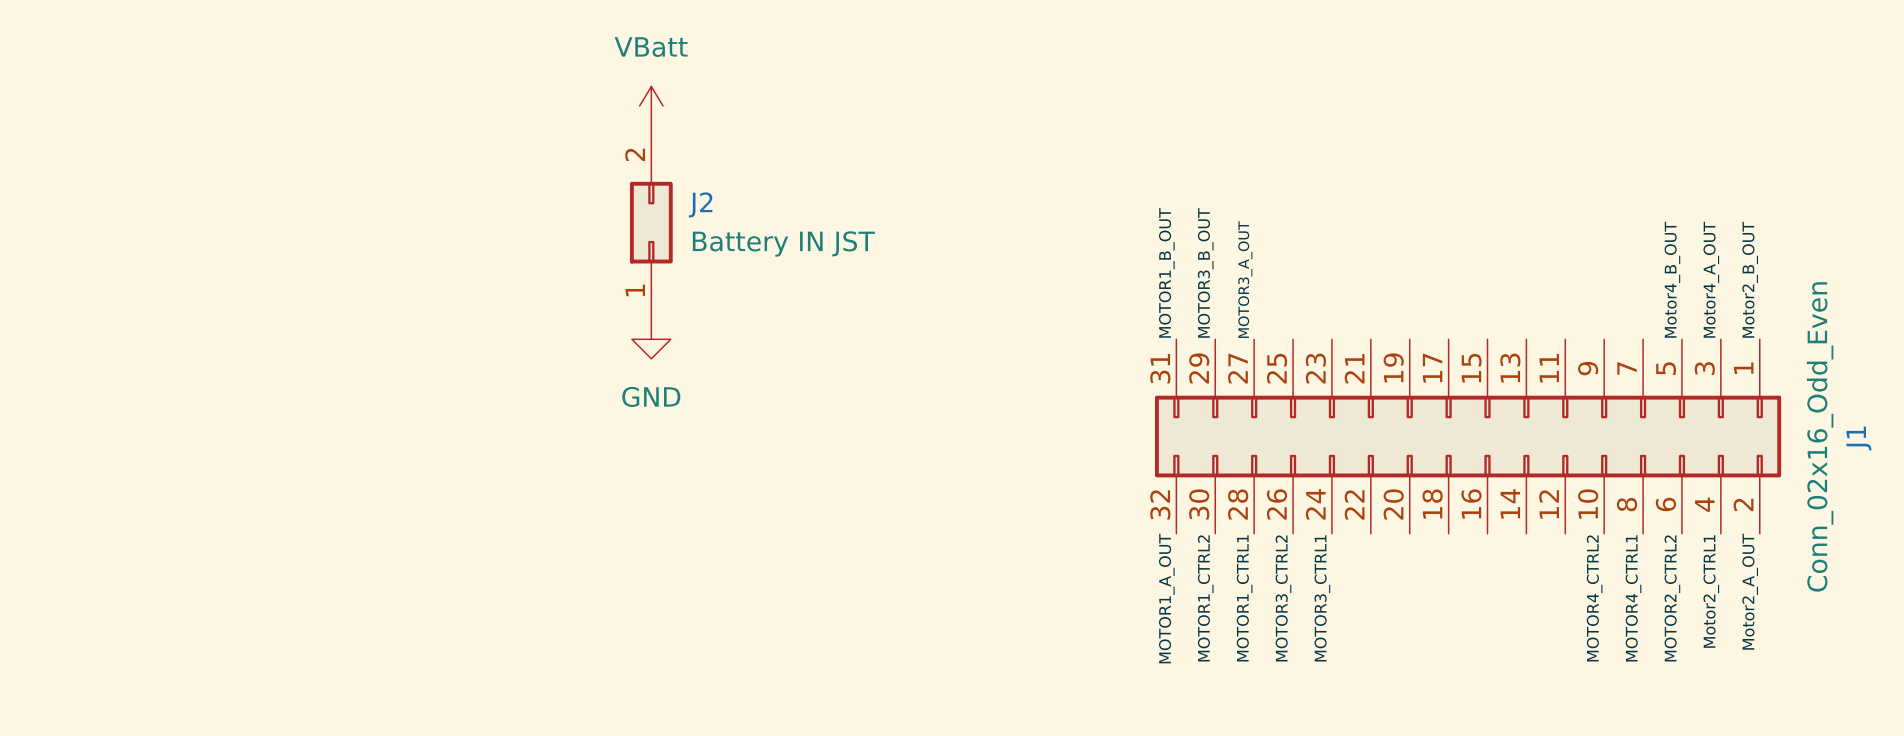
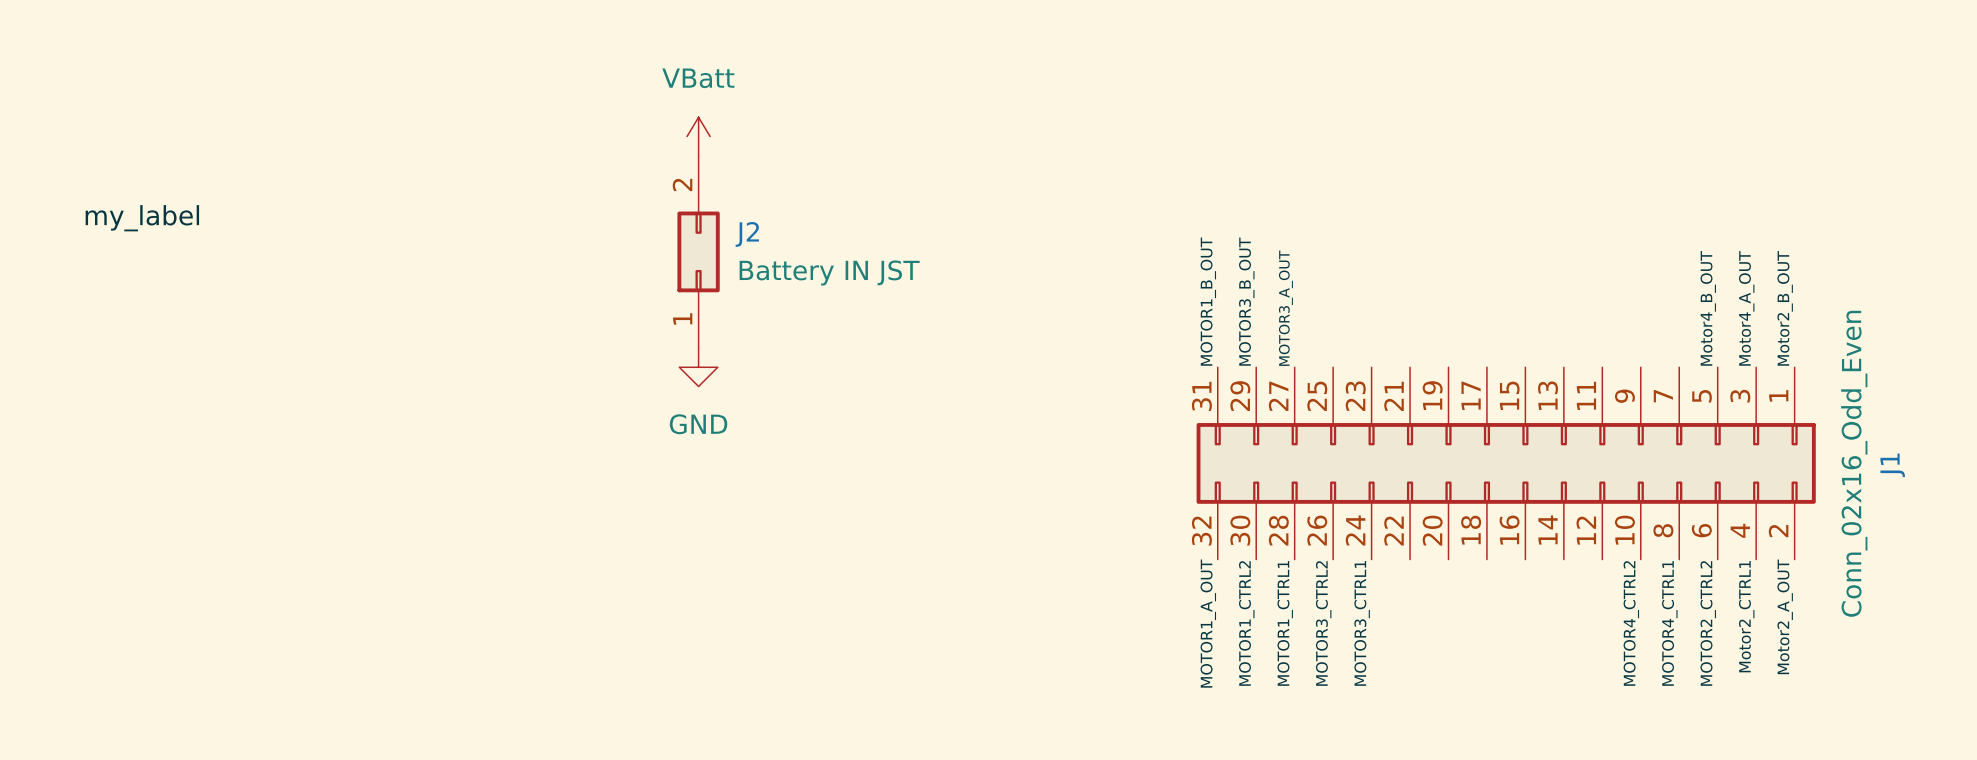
label: none -> my_label (142, 218)

